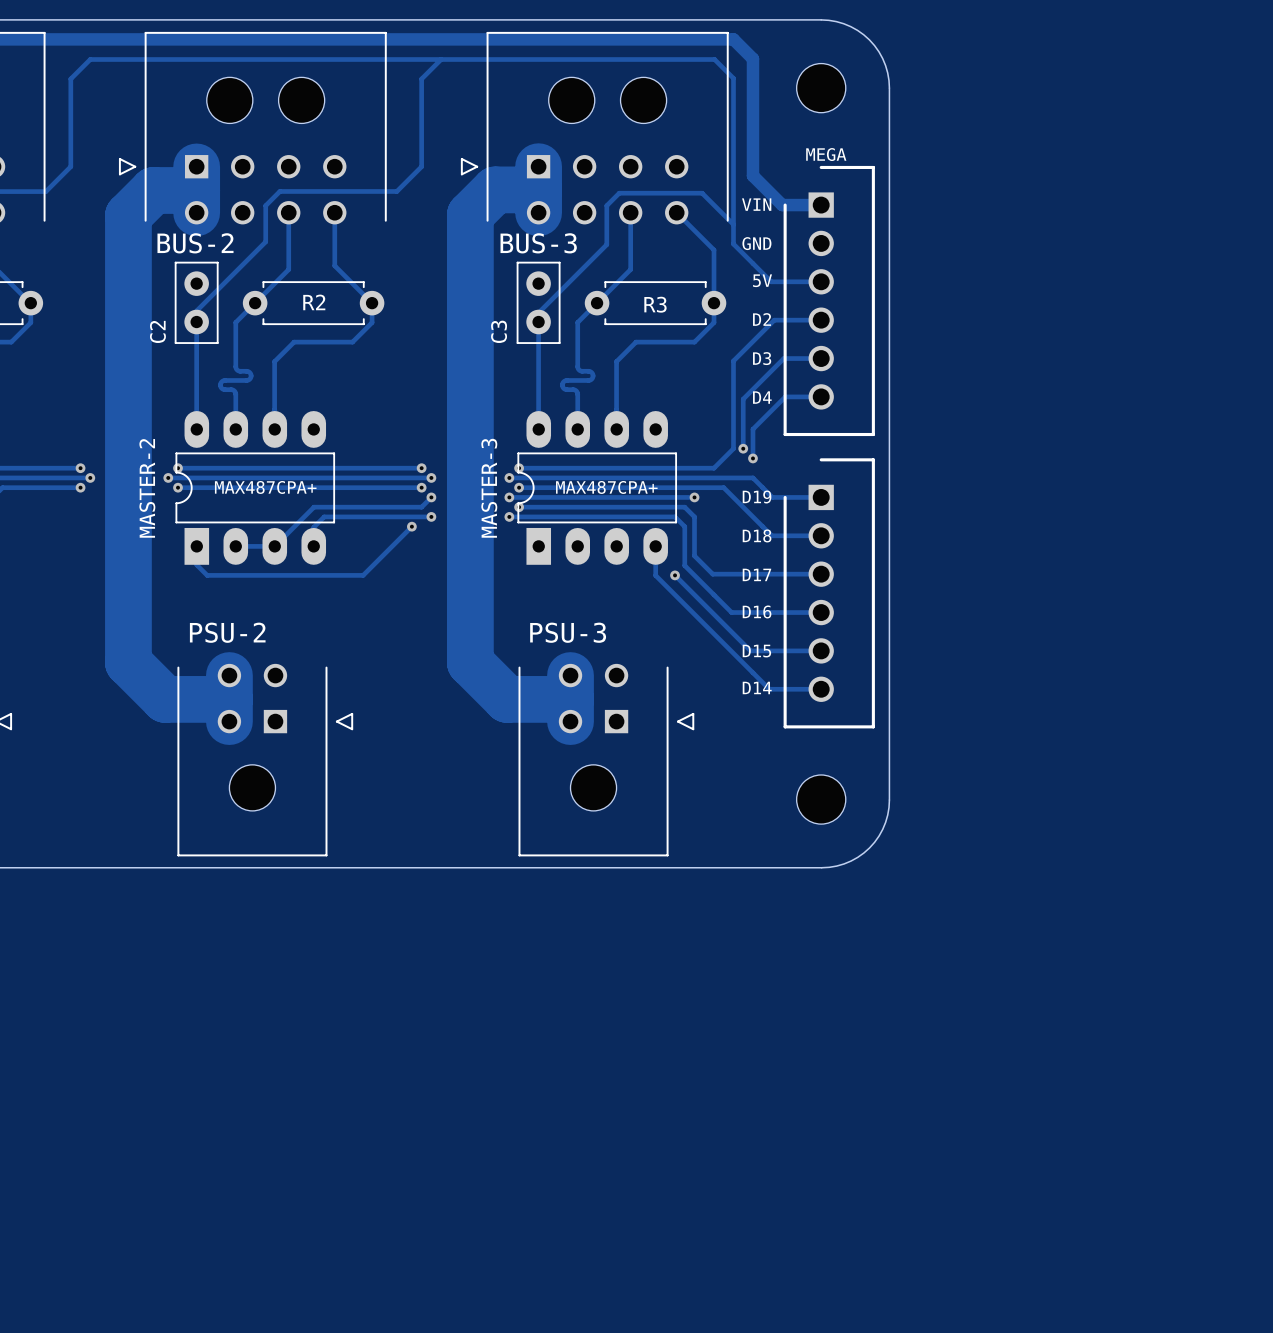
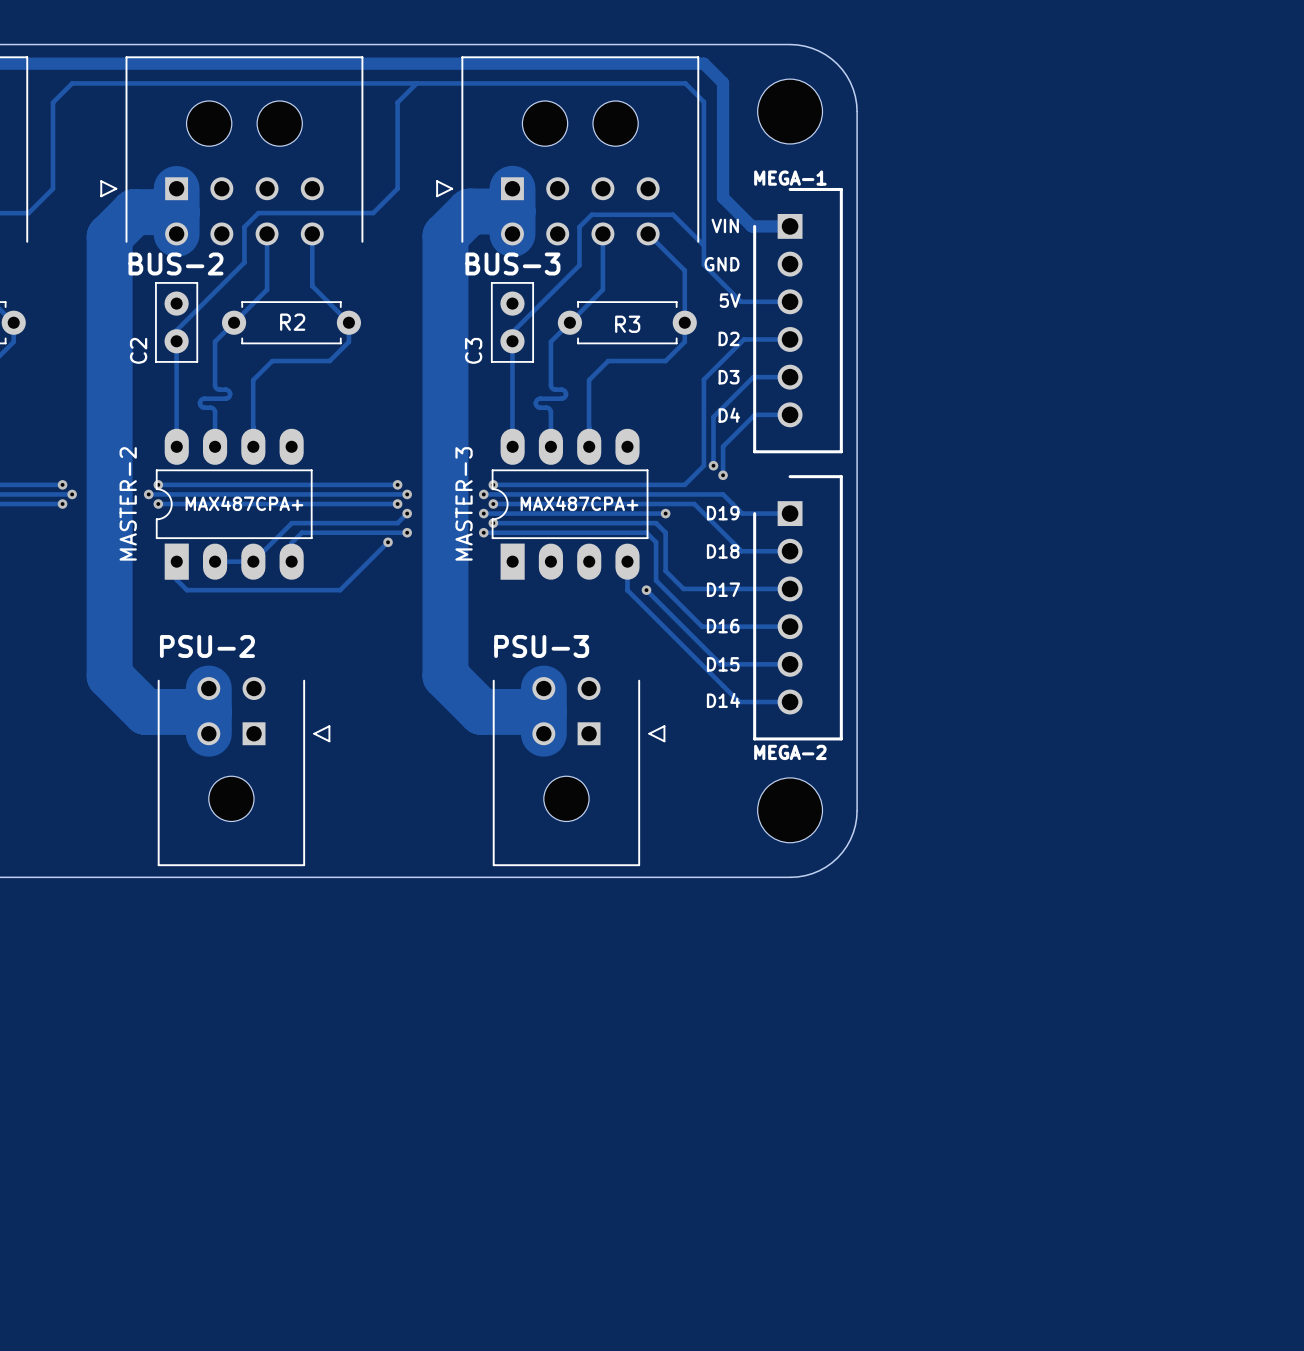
part footprint: [796, 63, 846, 113] -> [757, 79, 823, 144]
MEGA name: MEGA (826, 154) -> MEGA-1 (790, 178)
MEGA-2 name: none -> MEGA-2 (790, 752)
part footprint: [796, 774, 846, 825] -> [757, 777, 823, 843]

